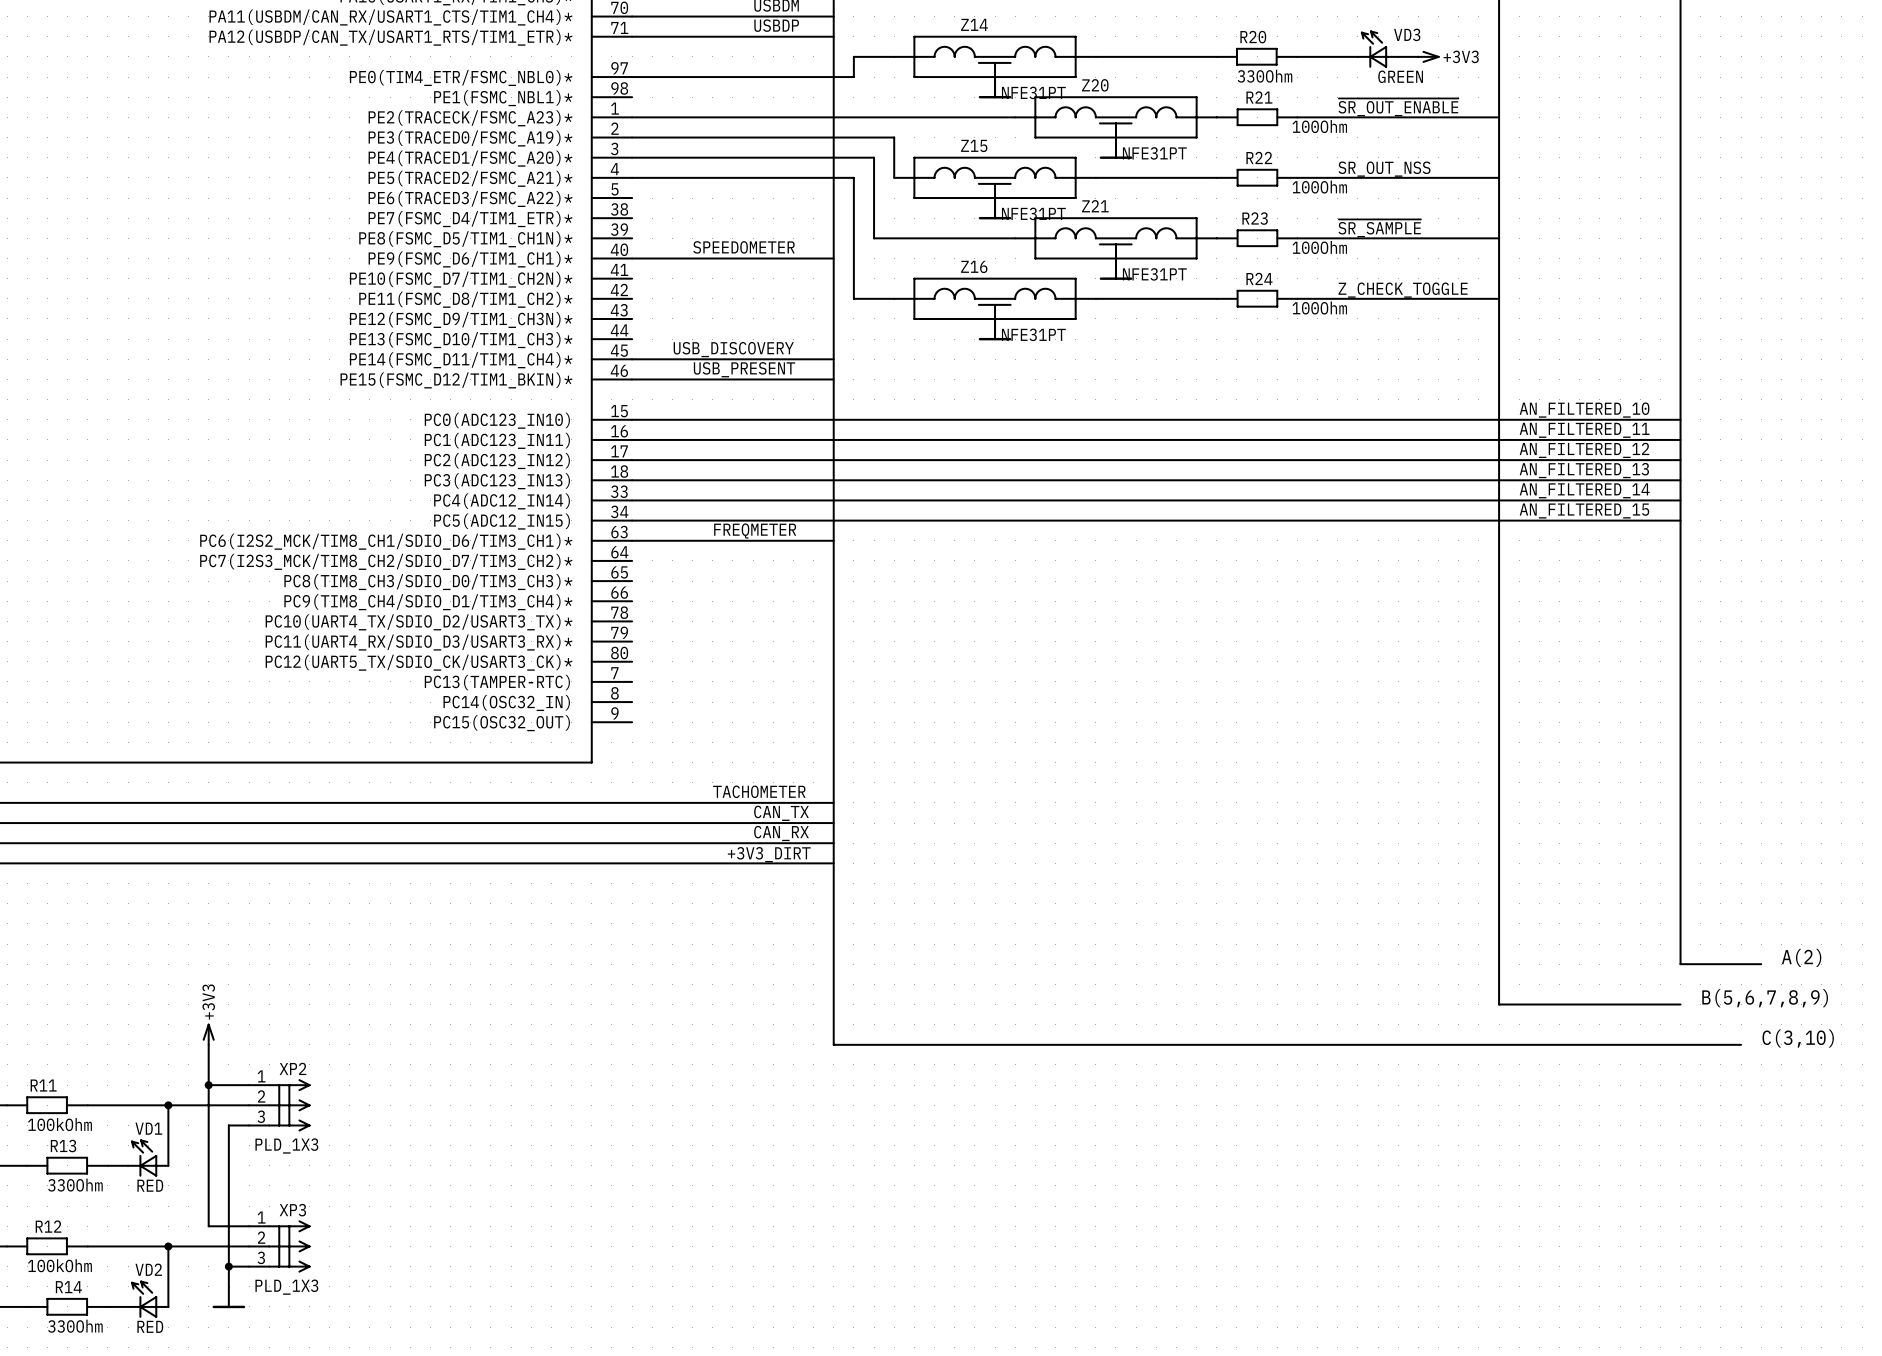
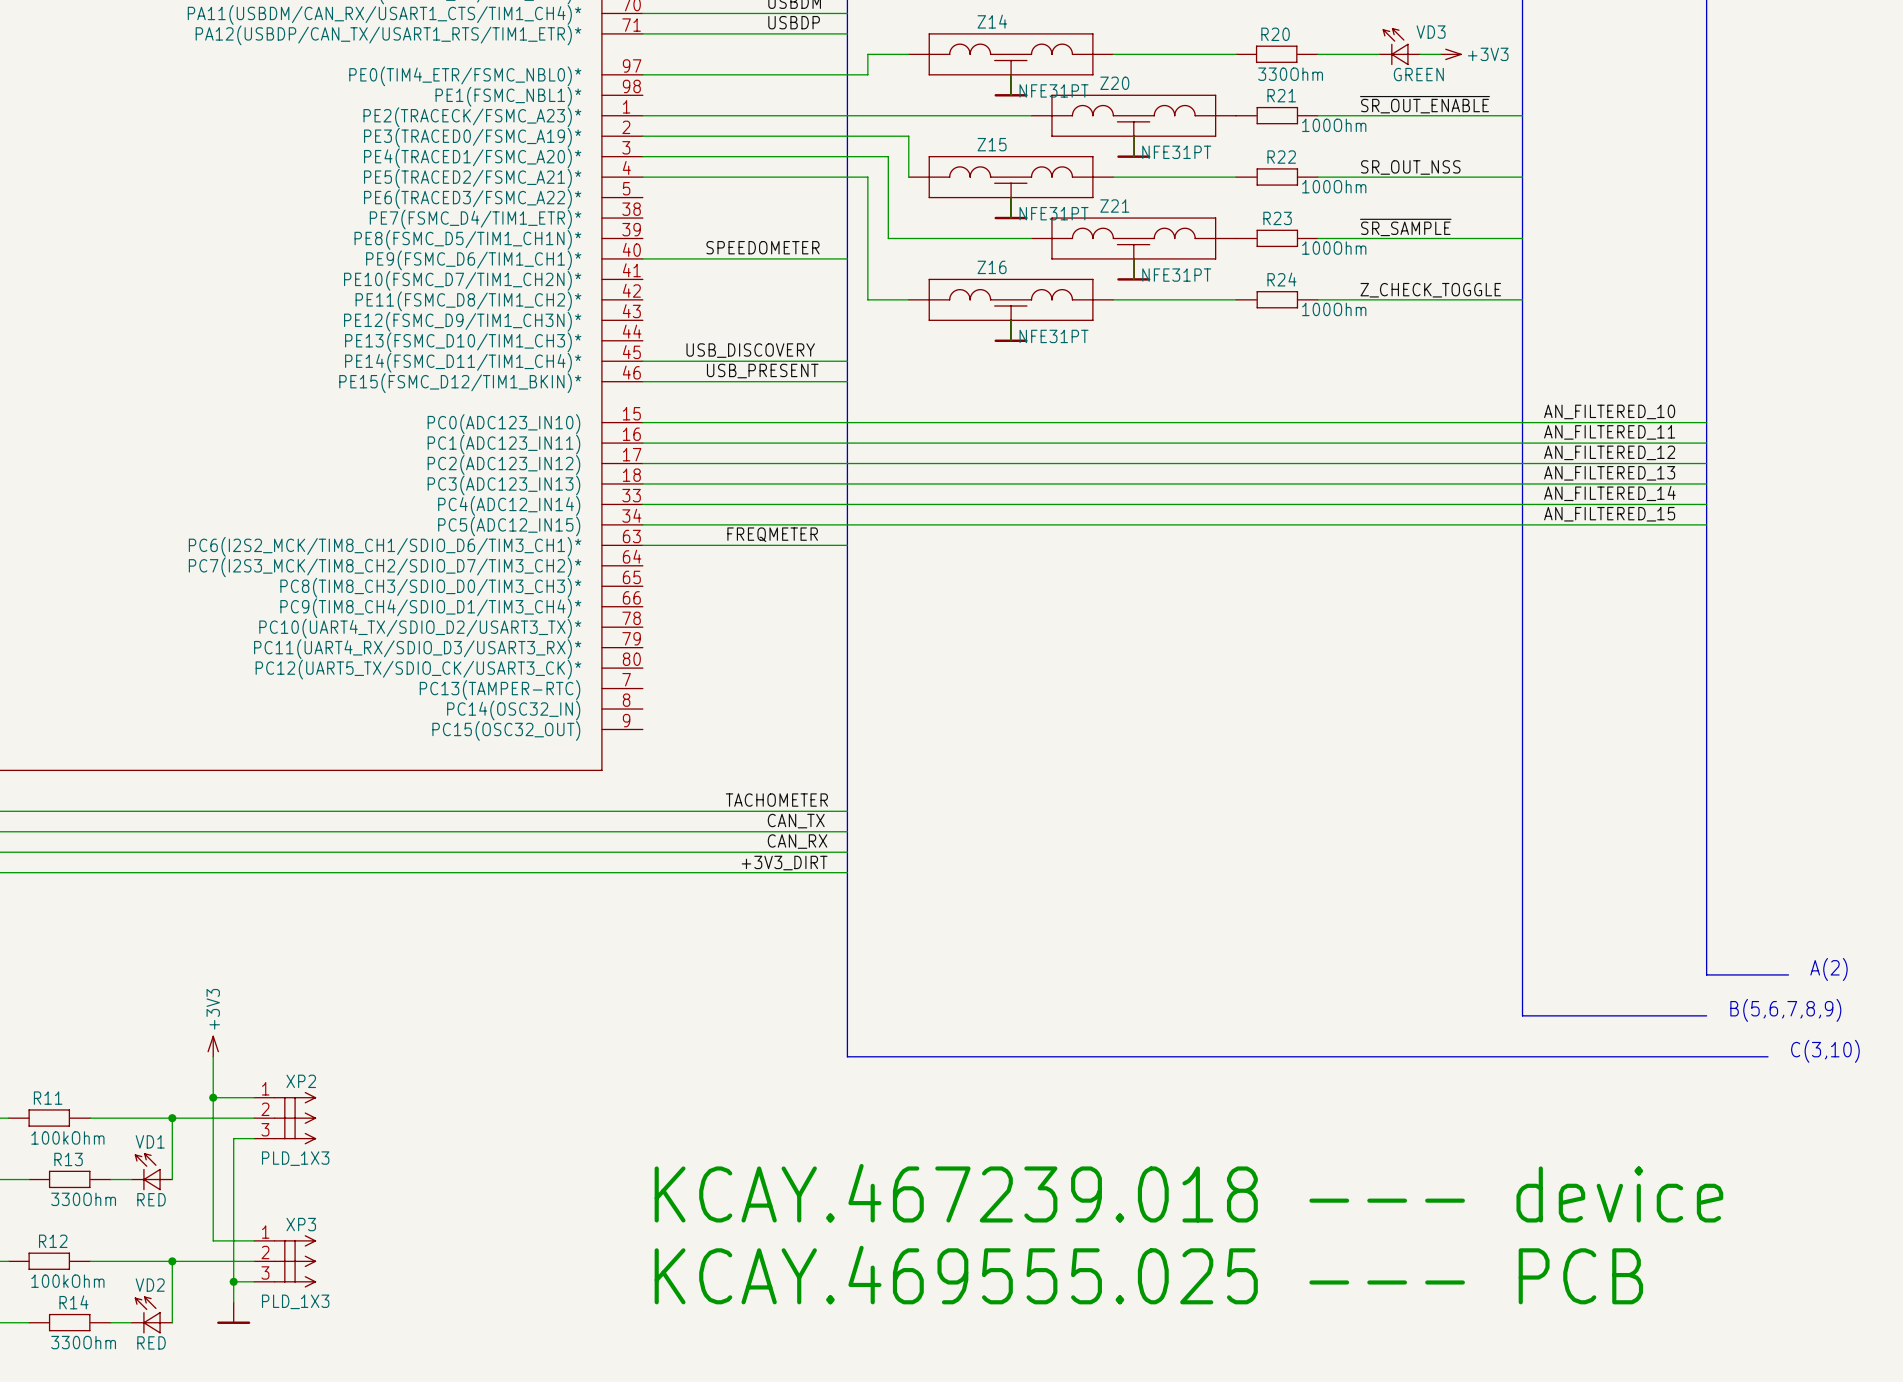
text: none -> KCAY.467239.018 --- device (1188, 1193)
text: none -> KCAY.469555.025 --- PCB (1148, 1275)

